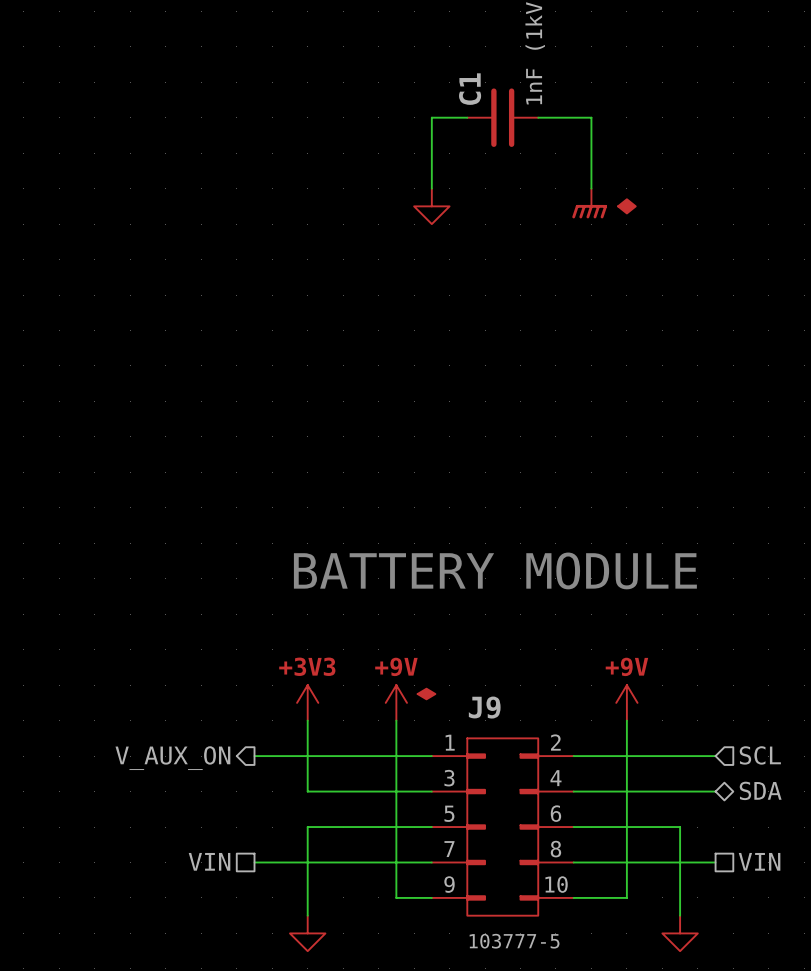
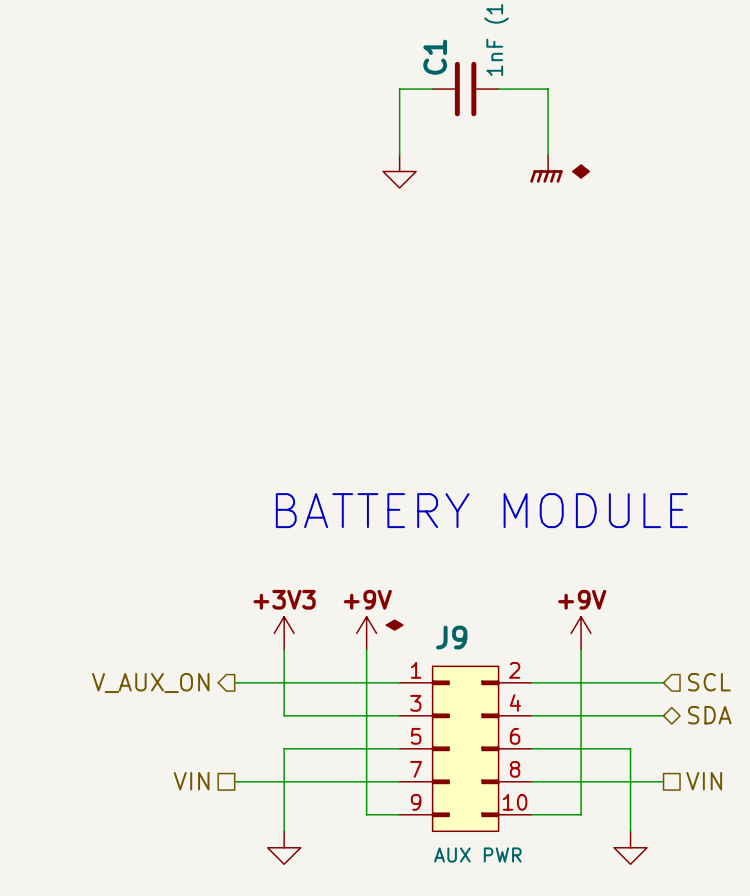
J9 value: 103777-5 (514, 941) -> AUX PWR (477, 855)

